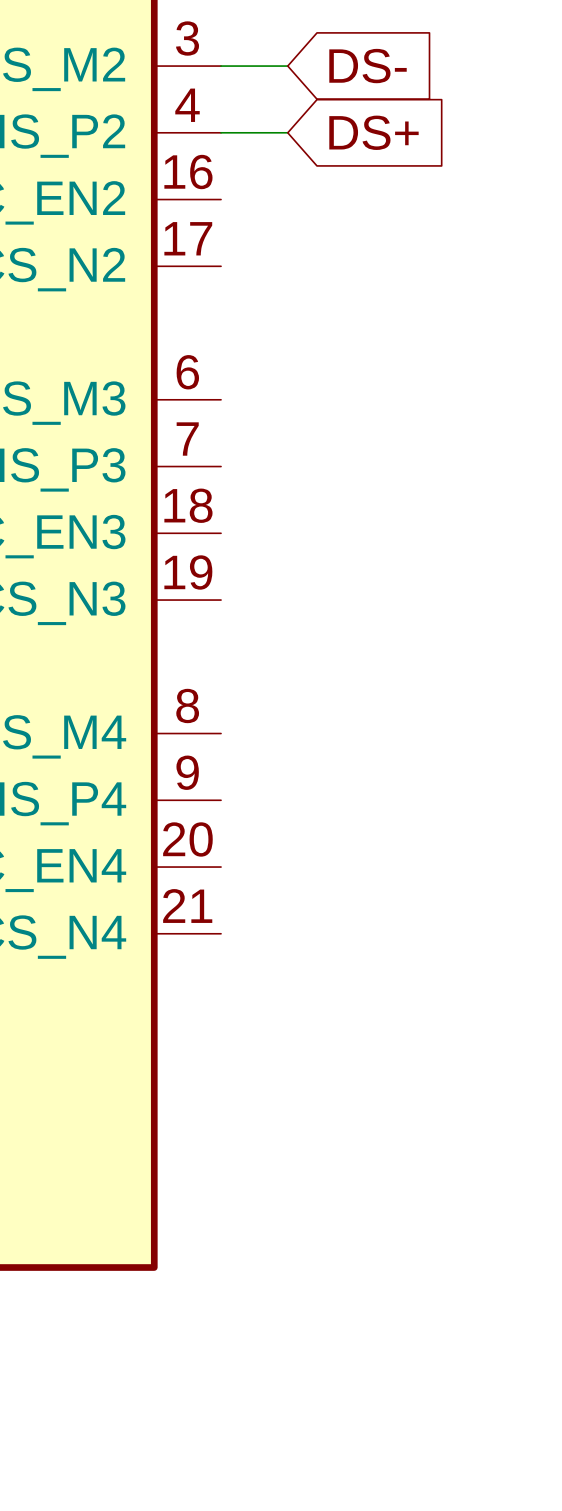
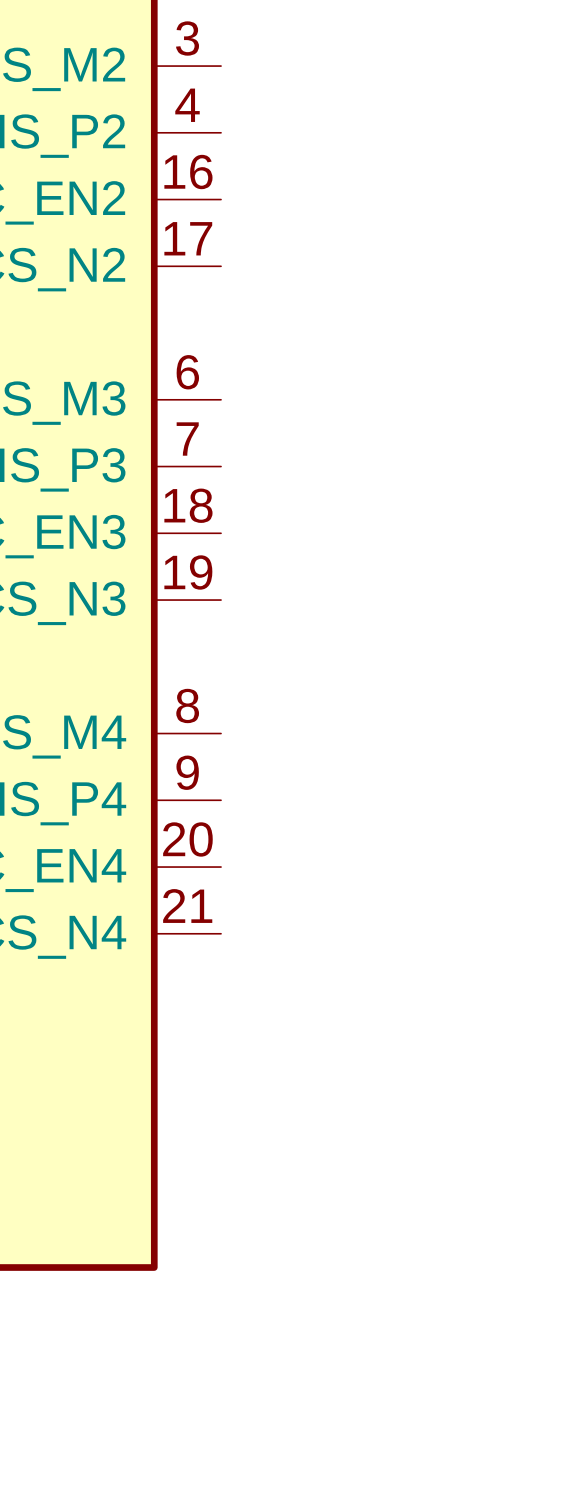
wire: (221, 66) (287, 66) -> none
global label: DS- (368, 66) -> none
wire: (221, 132) (287, 132) -> none
global label: DS+ (373, 132) -> none

